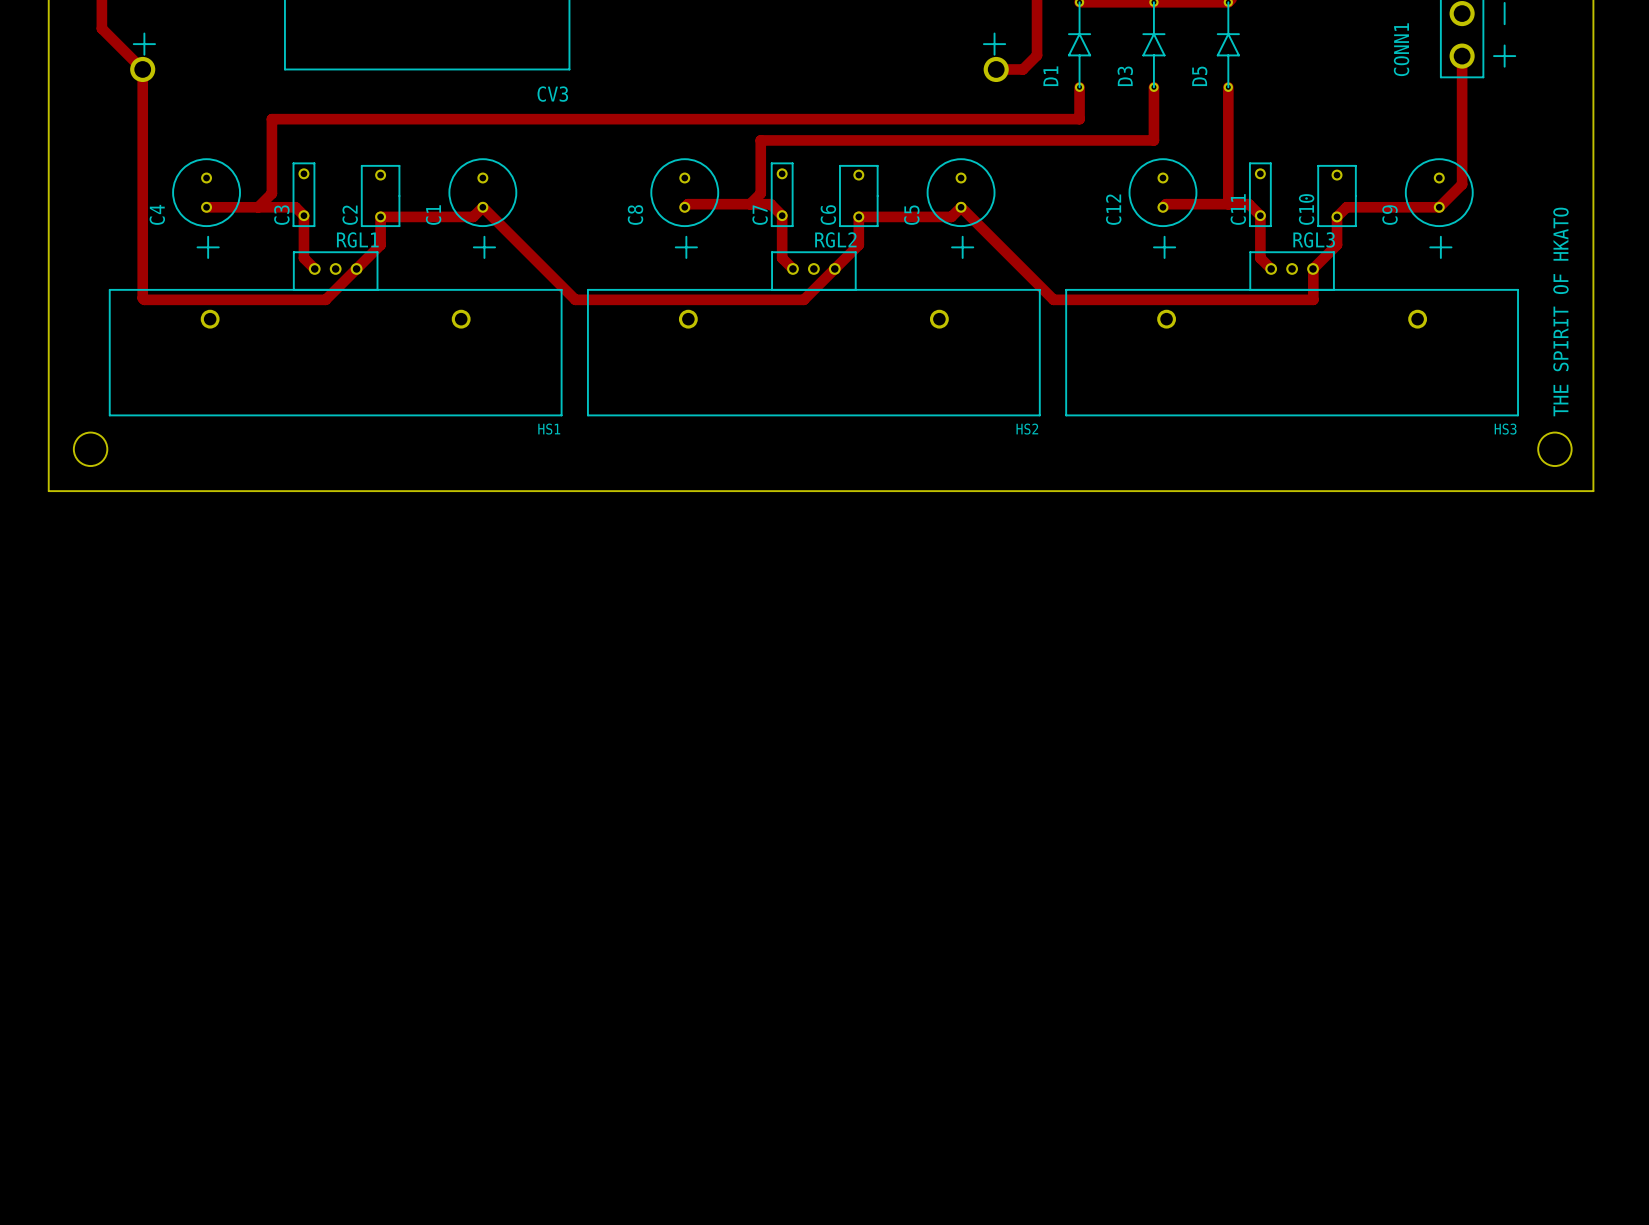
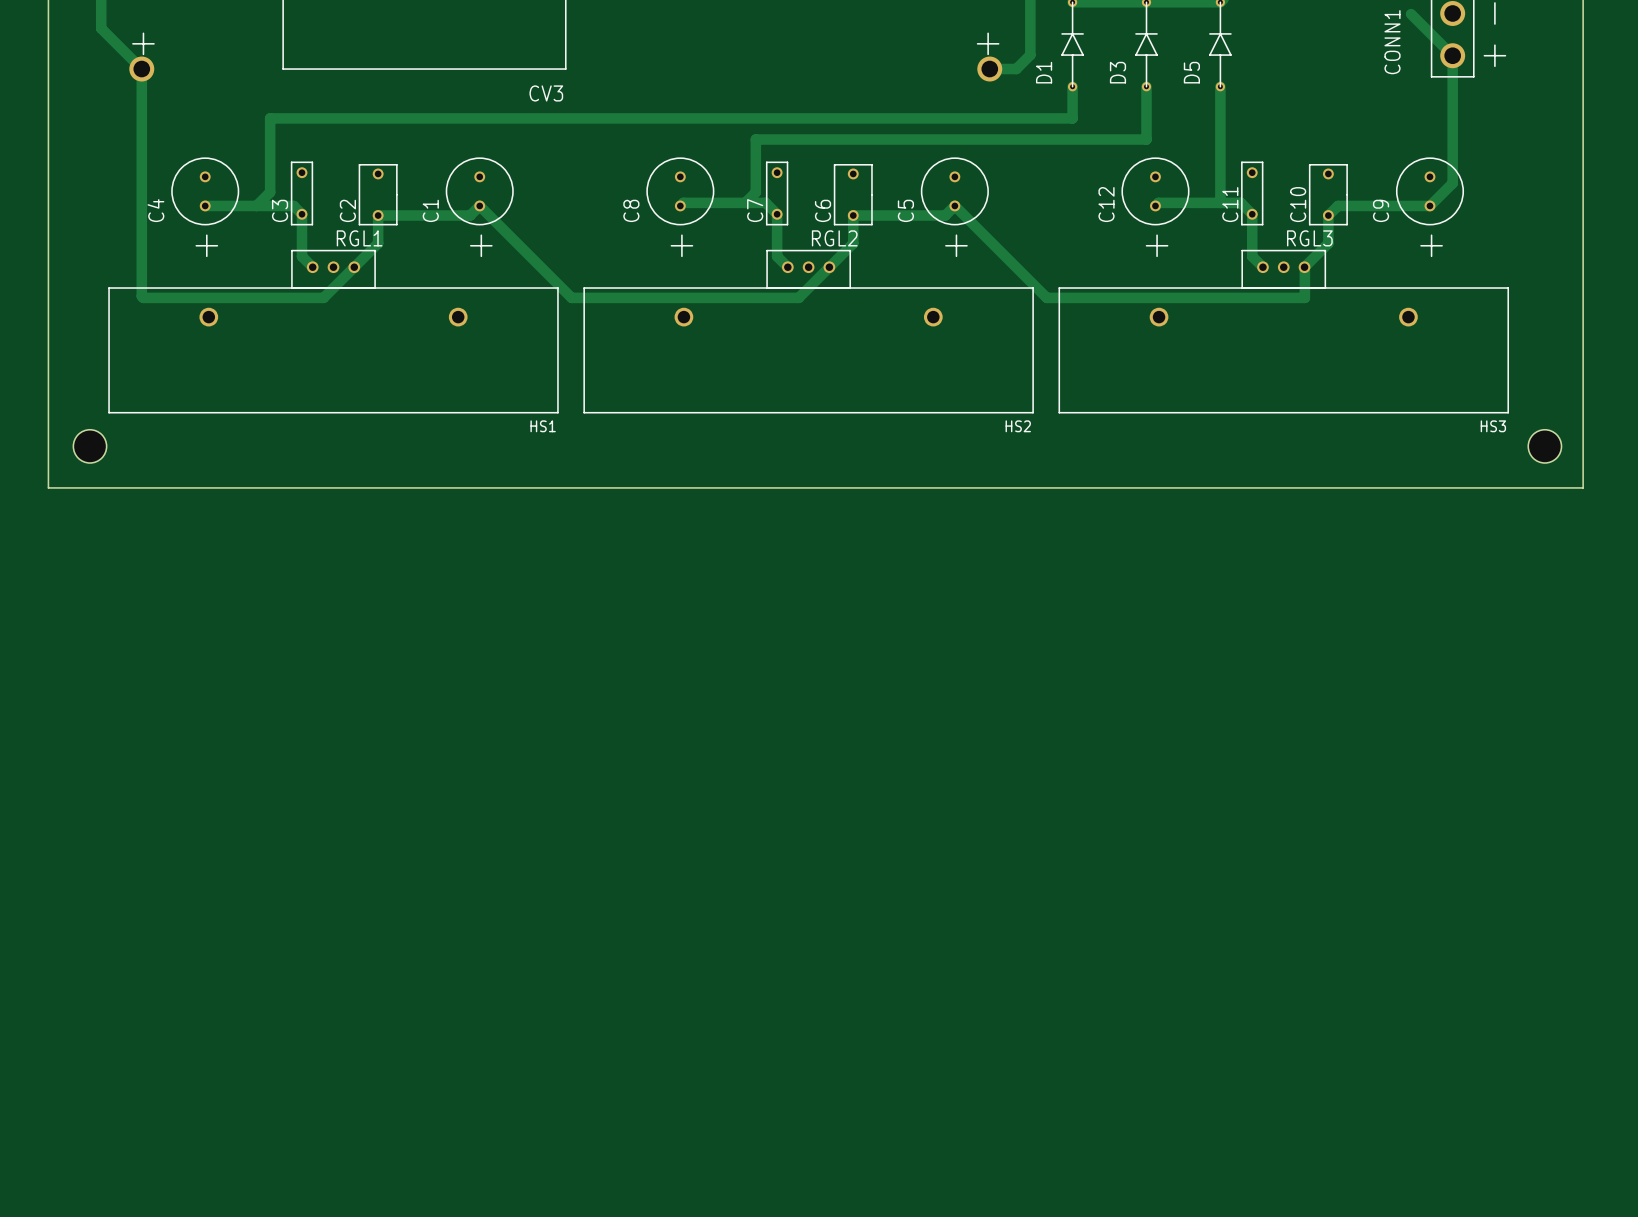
track: none -> (1411, 14) (1452, 55)
text: THE SPIRIT OF HKATO (1560, 312) -> none

